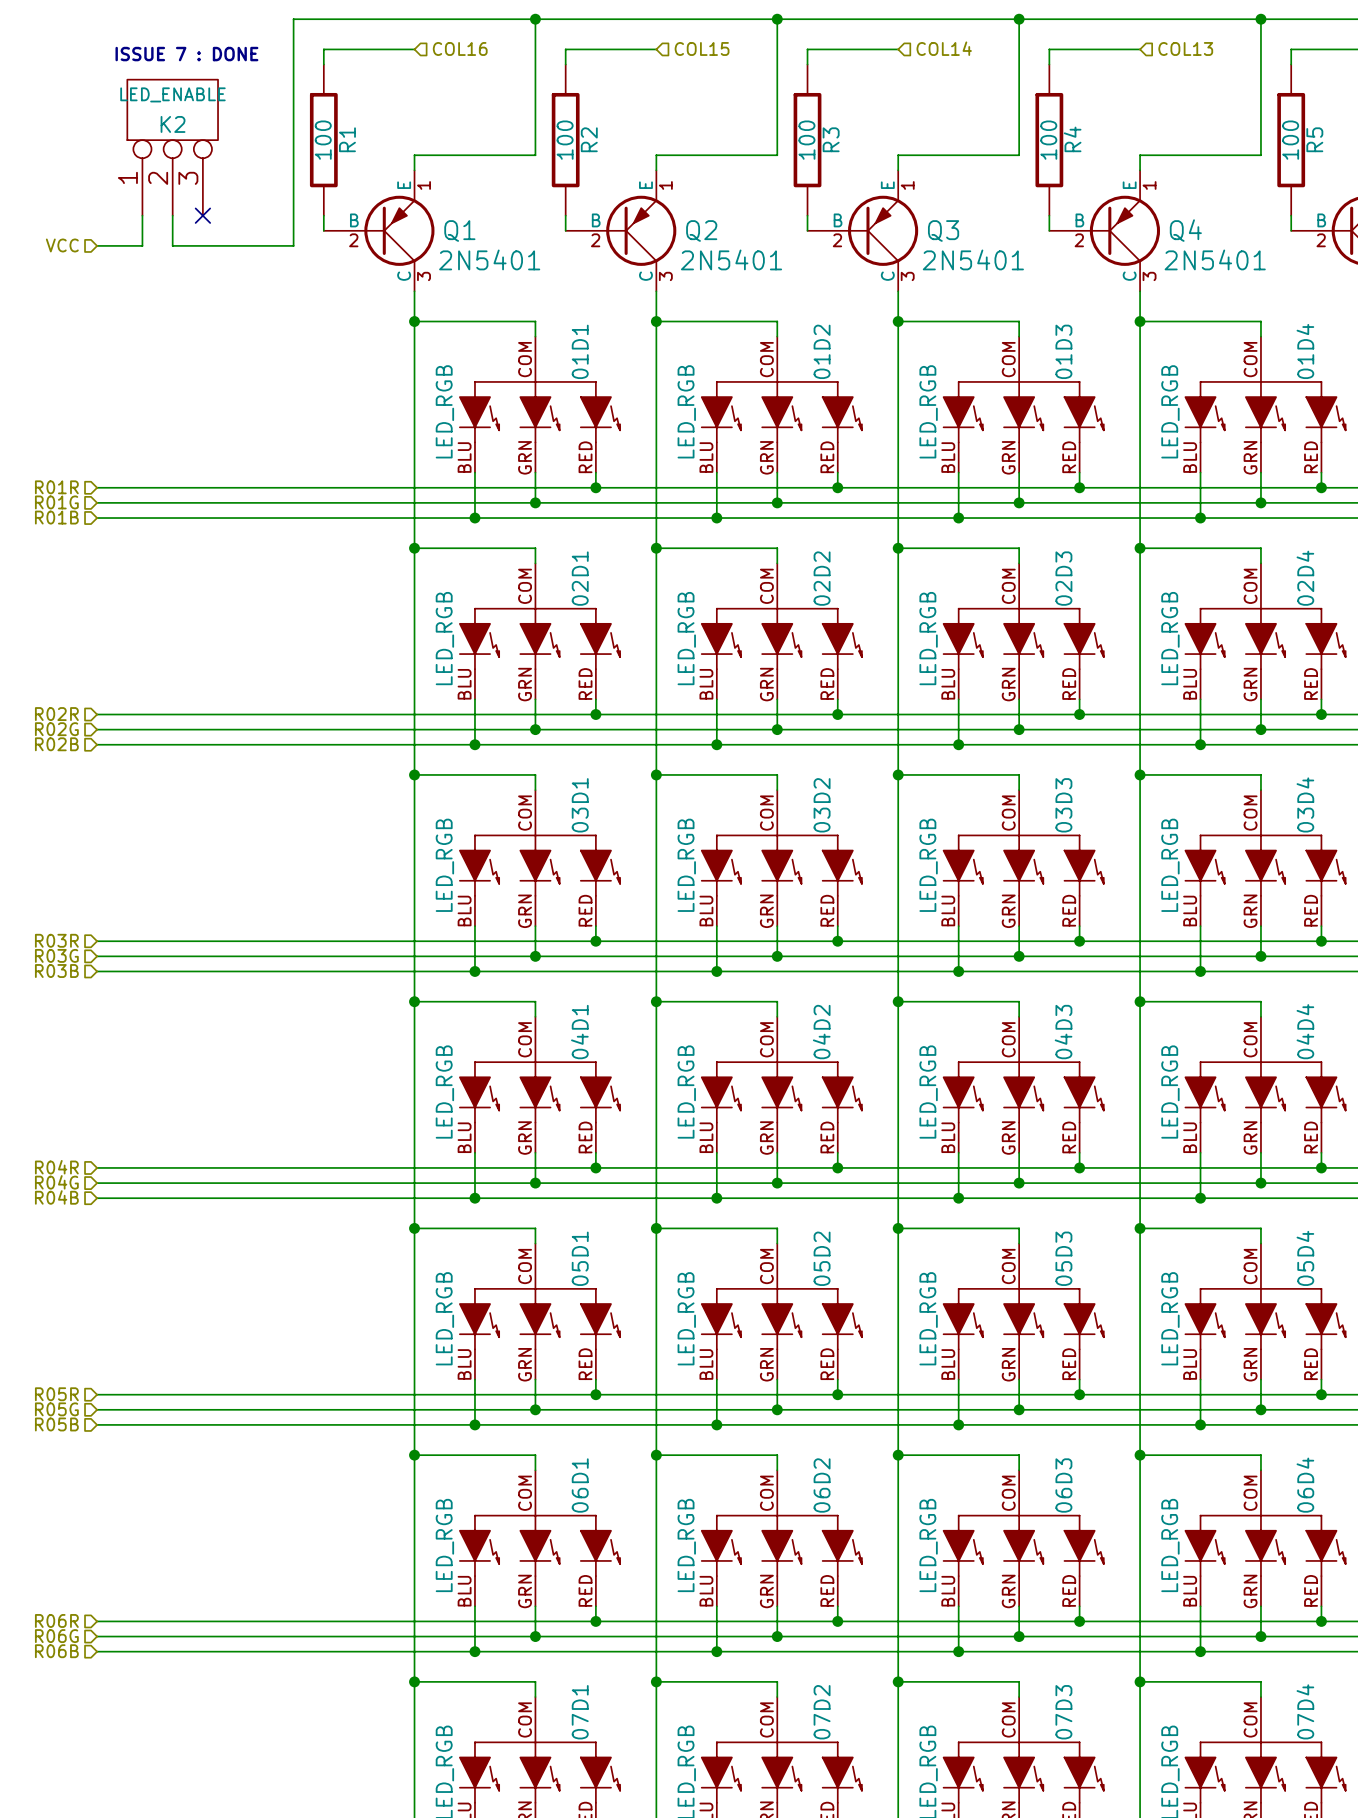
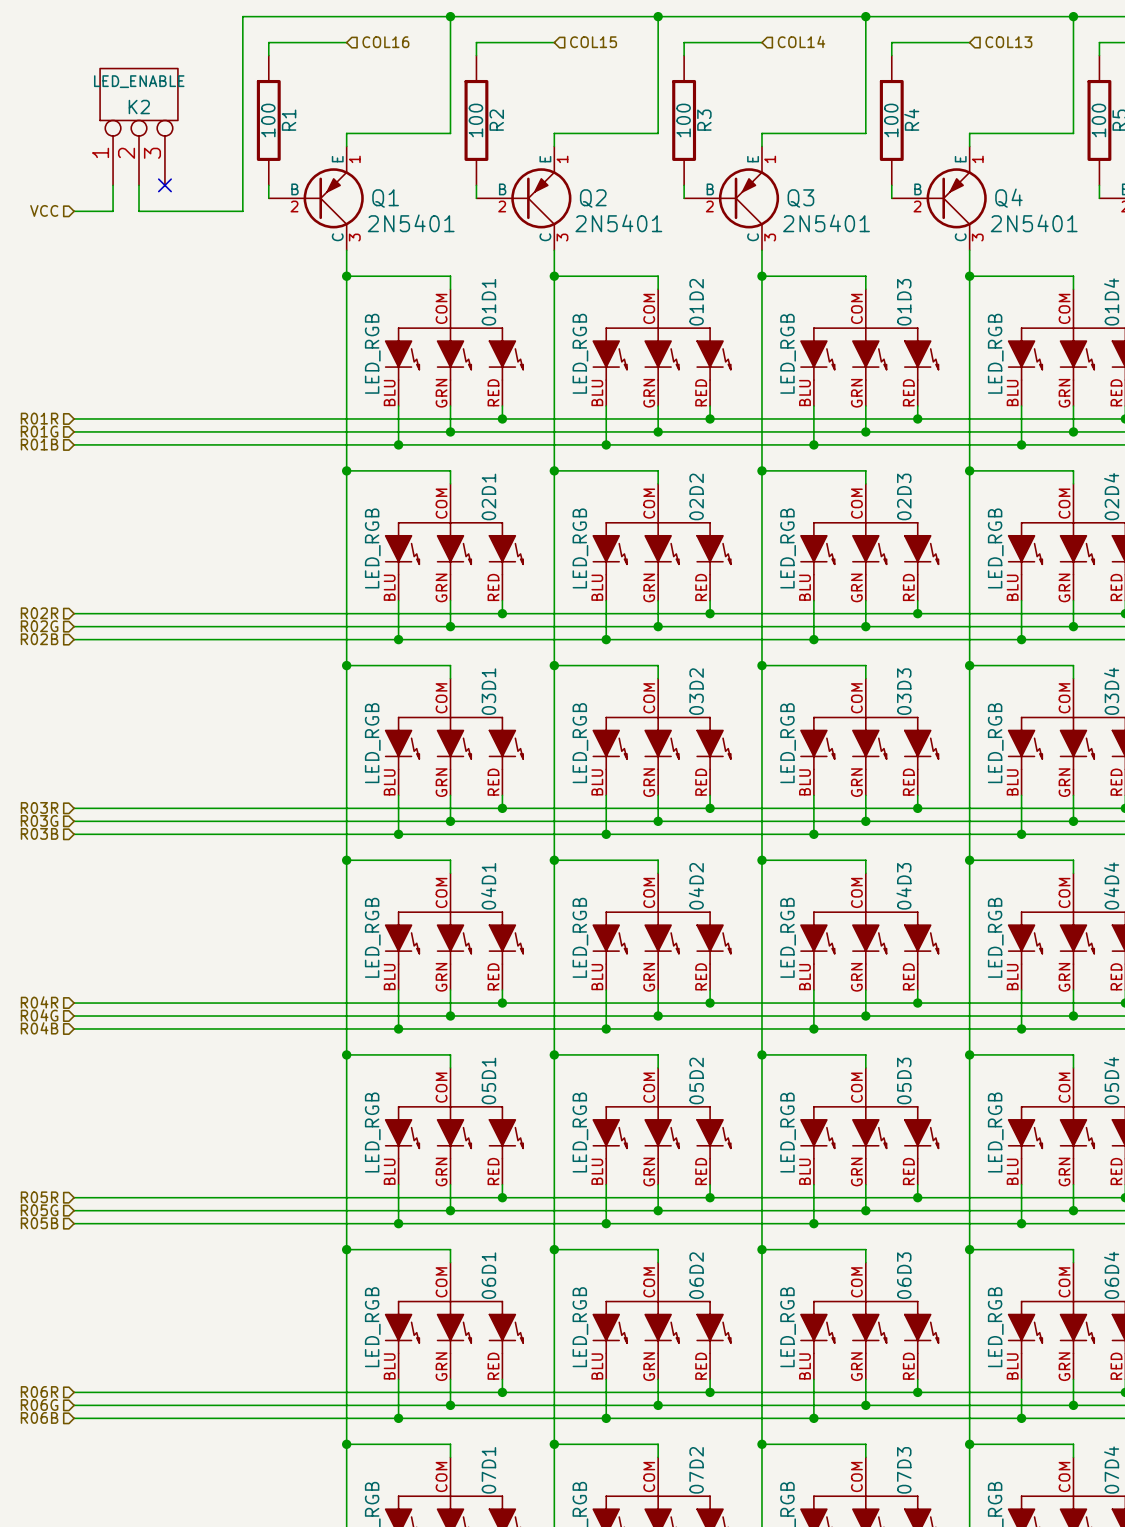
text: ISSUE 7 : DONE (186, 54) -> none

